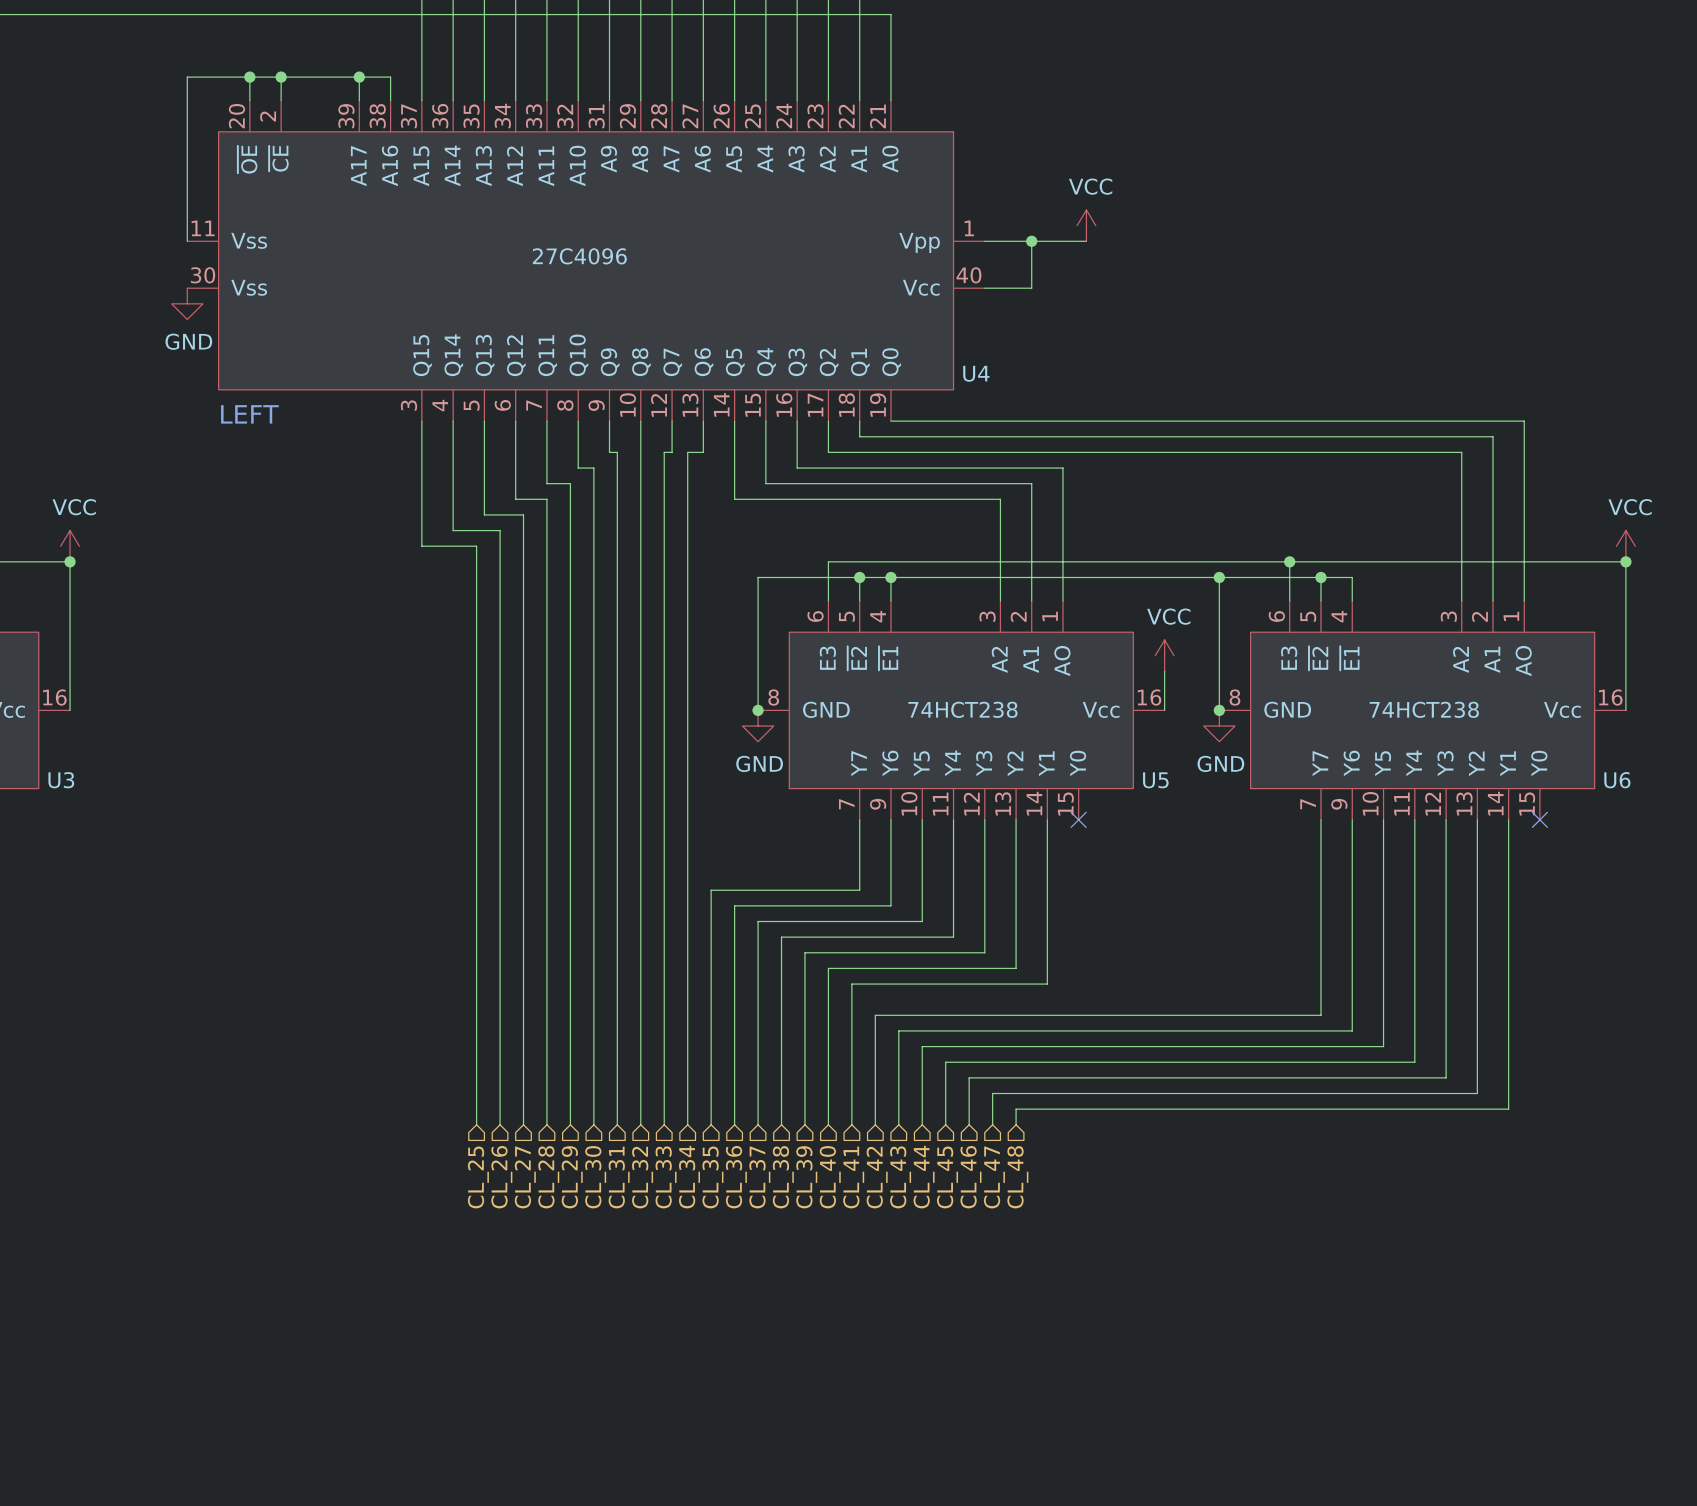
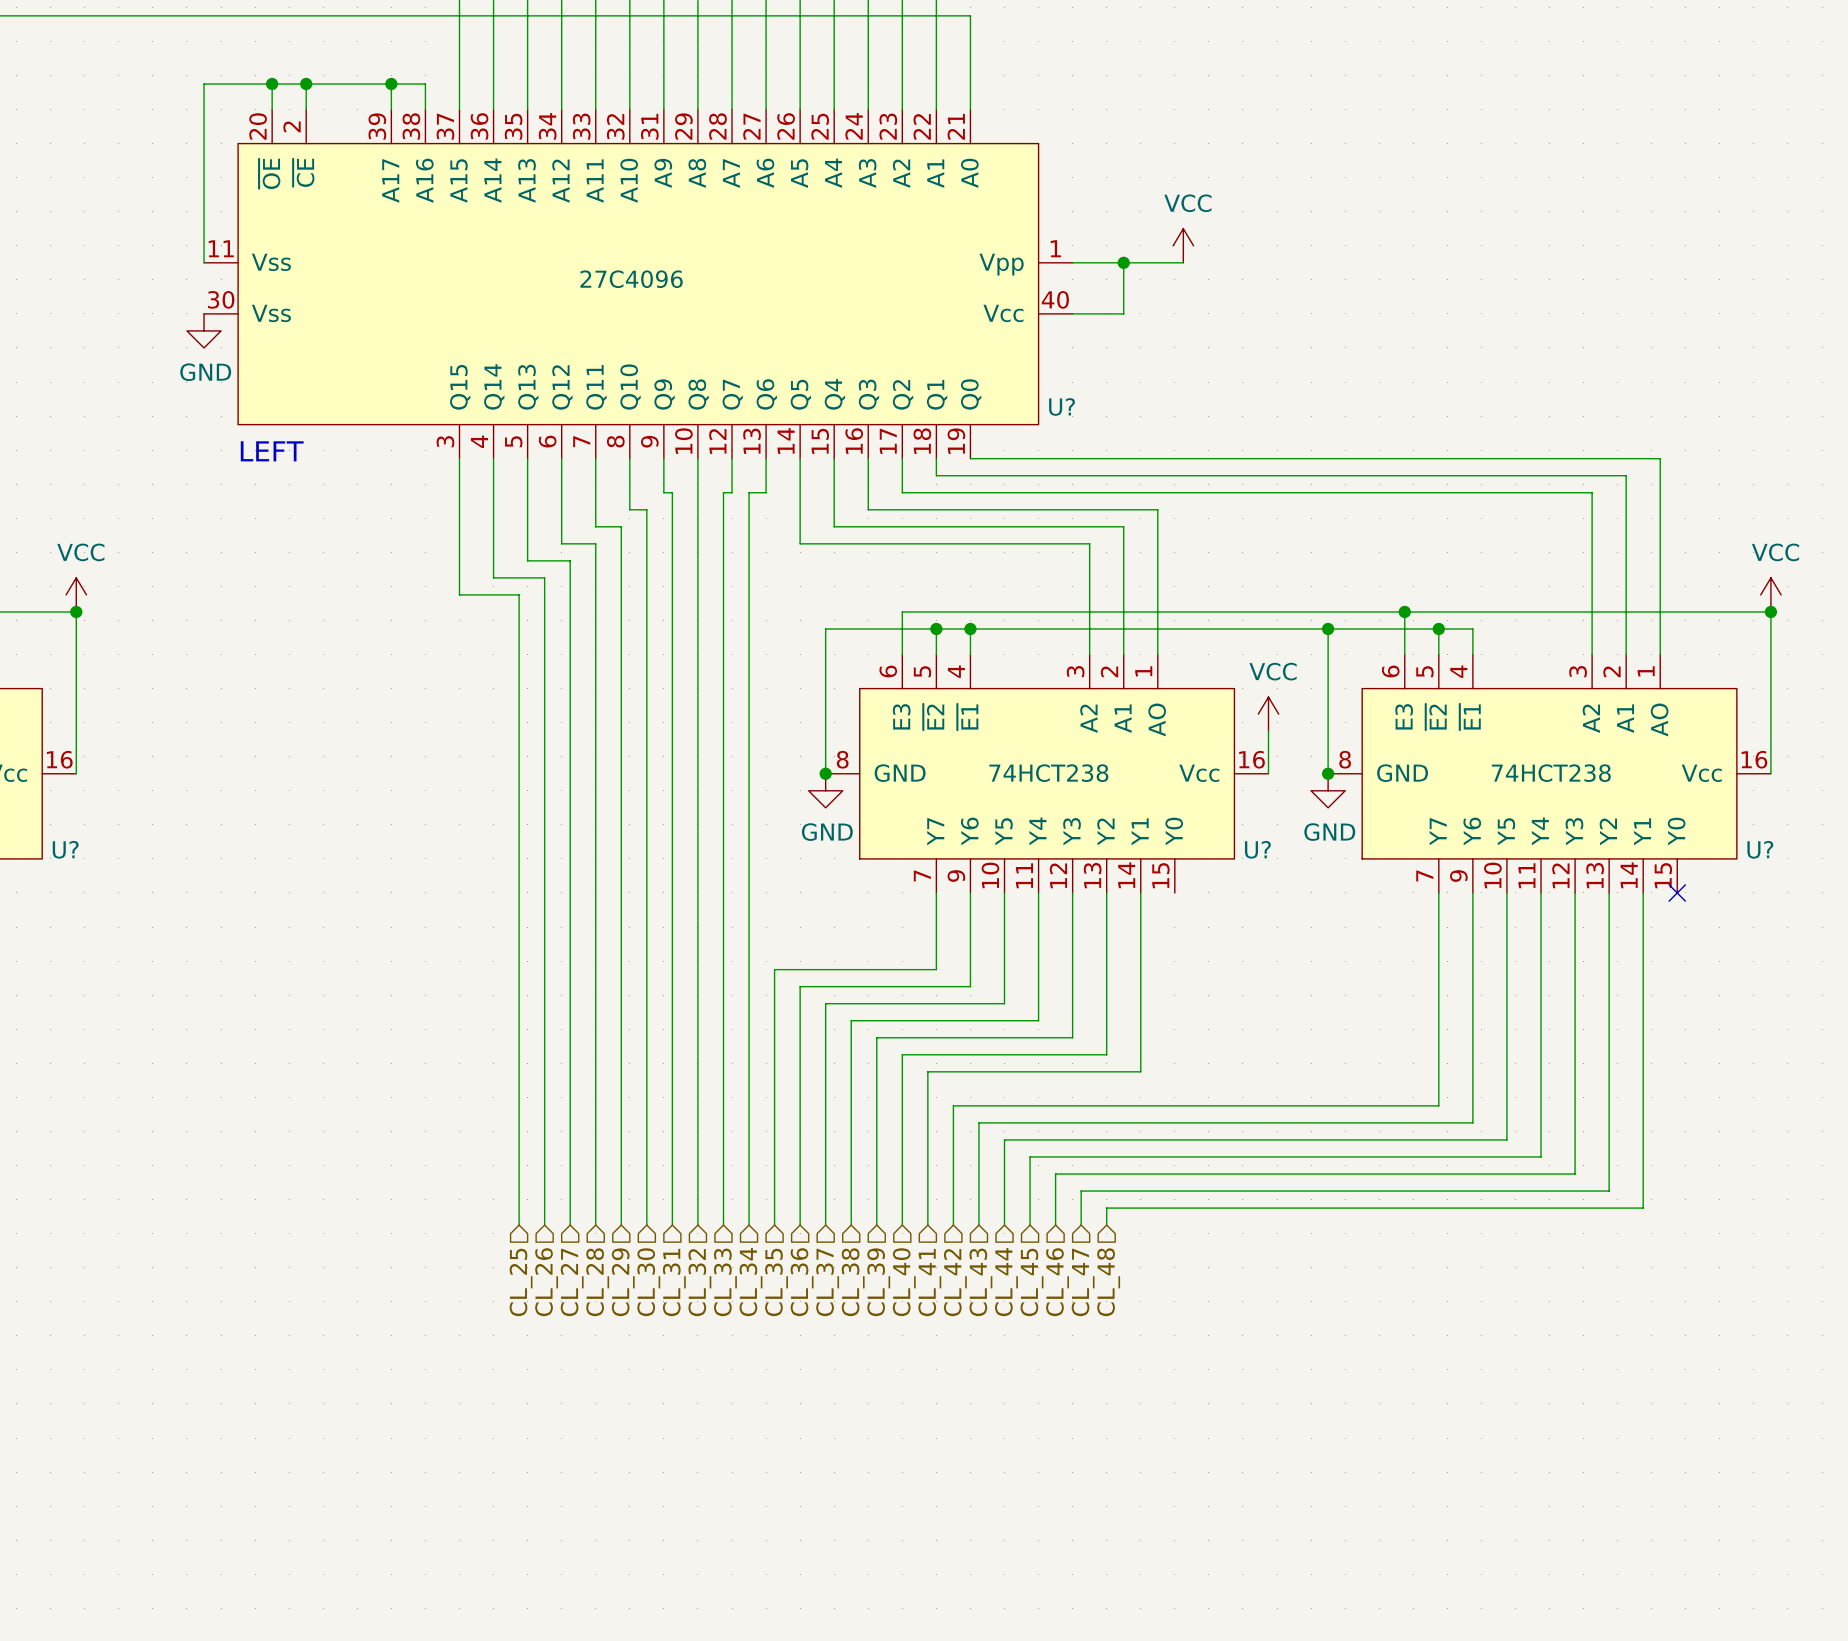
U4 name: U4 (976, 373) -> U? (1062, 406)
U3 name: U3 (61, 780) -> U? (65, 849)
U5 name: U5 (1155, 780) -> U? (1257, 849)
U6 name: U6 (1617, 780) -> U? (1760, 849)
no-connect mark: (1078, 819) -> none

